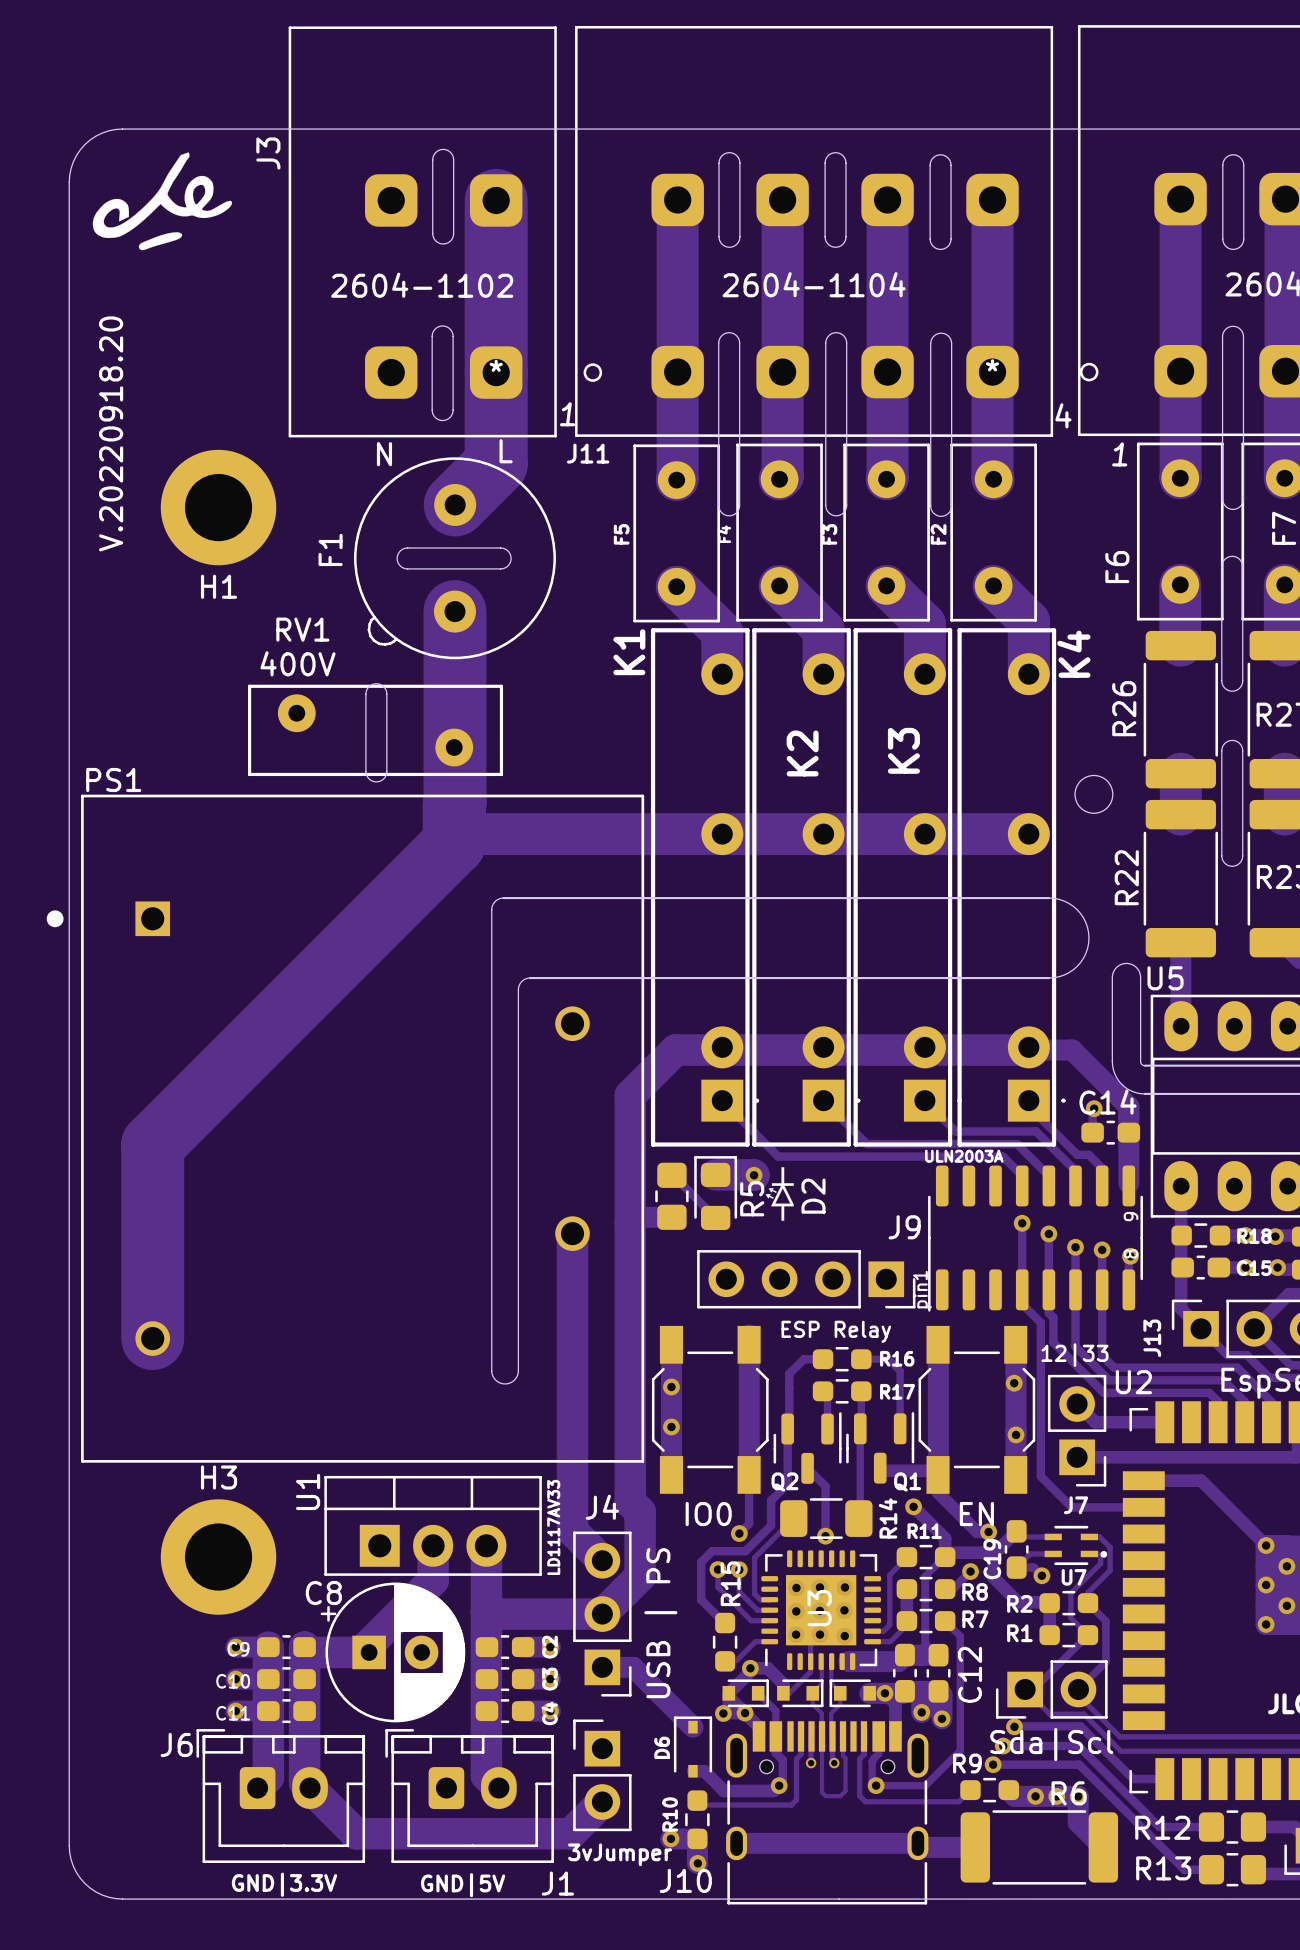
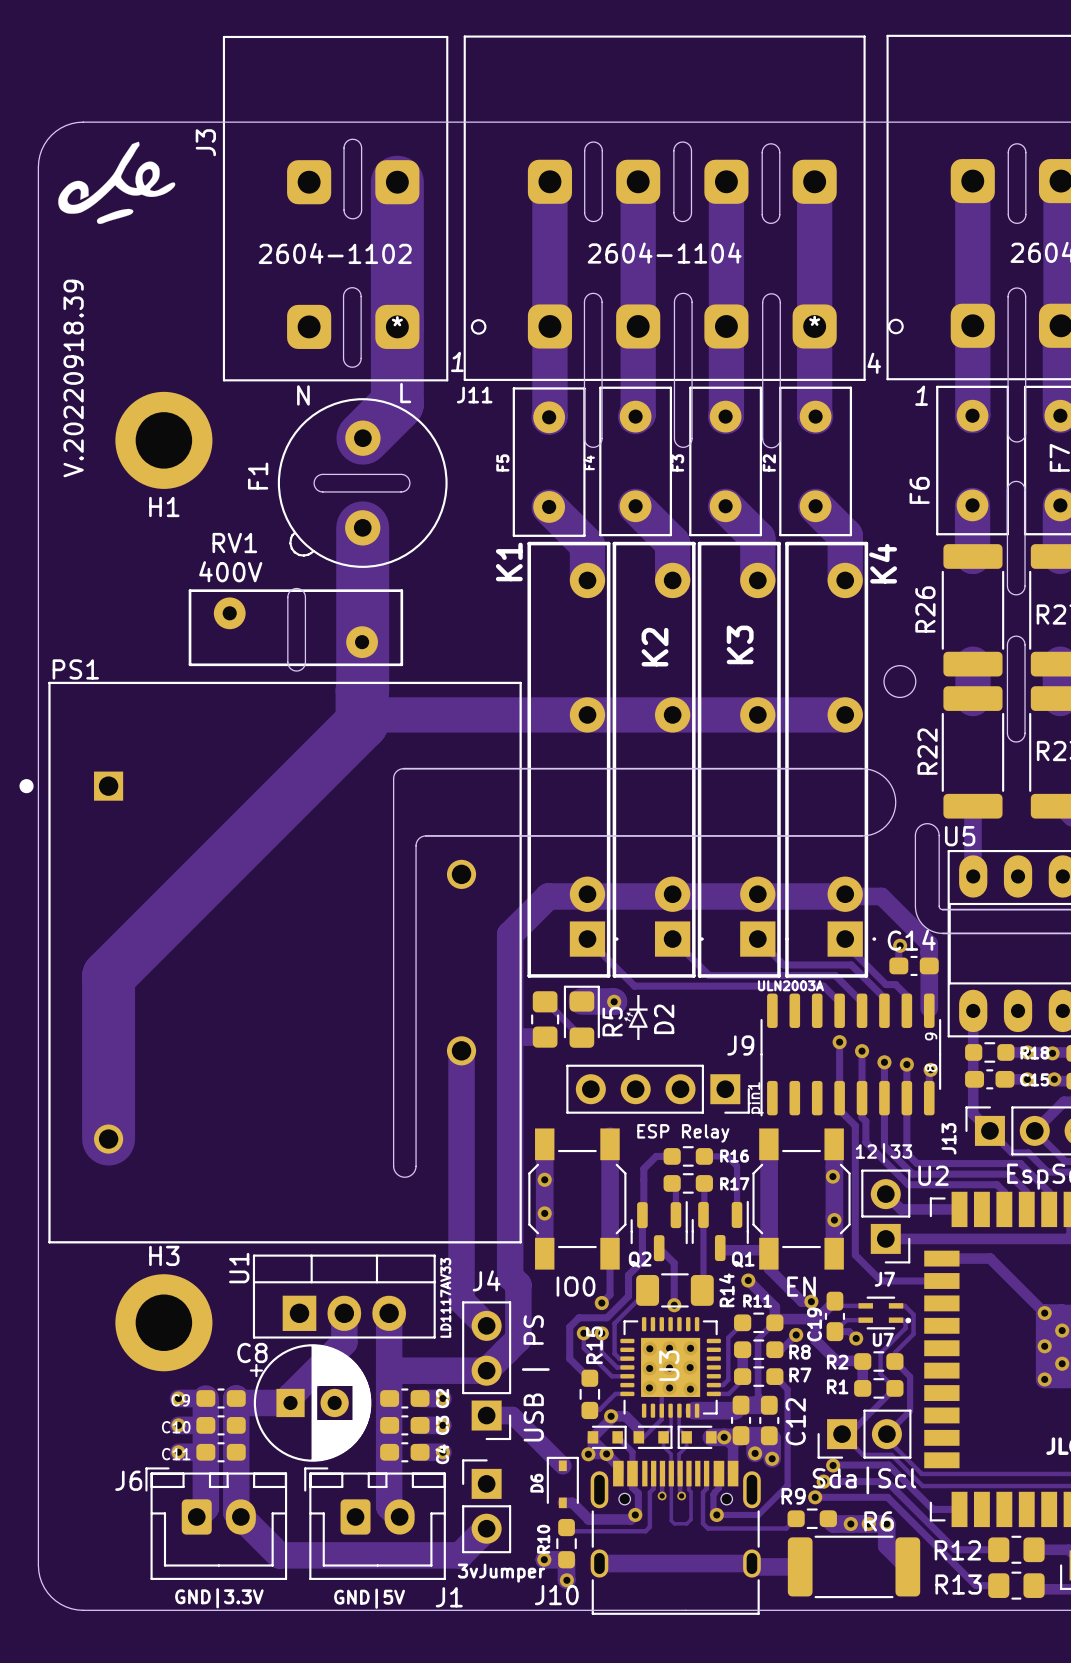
text: V.20220918.20 (111, 433) -> V.20220918.39 (73, 378)

